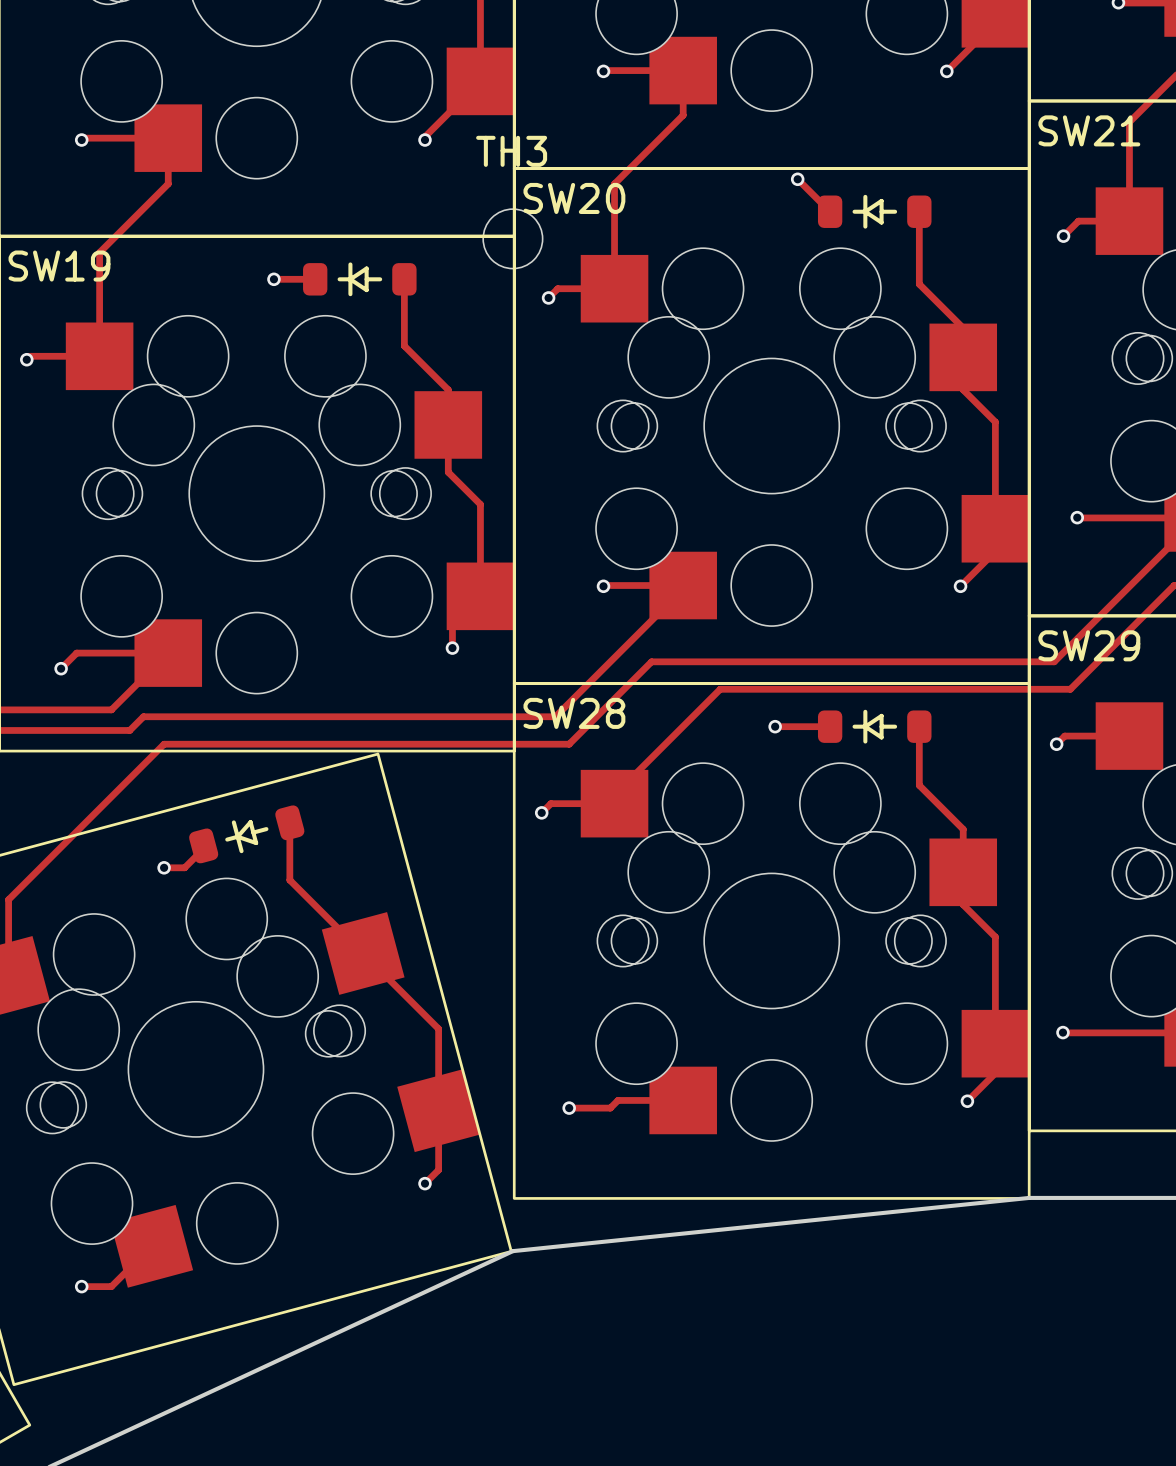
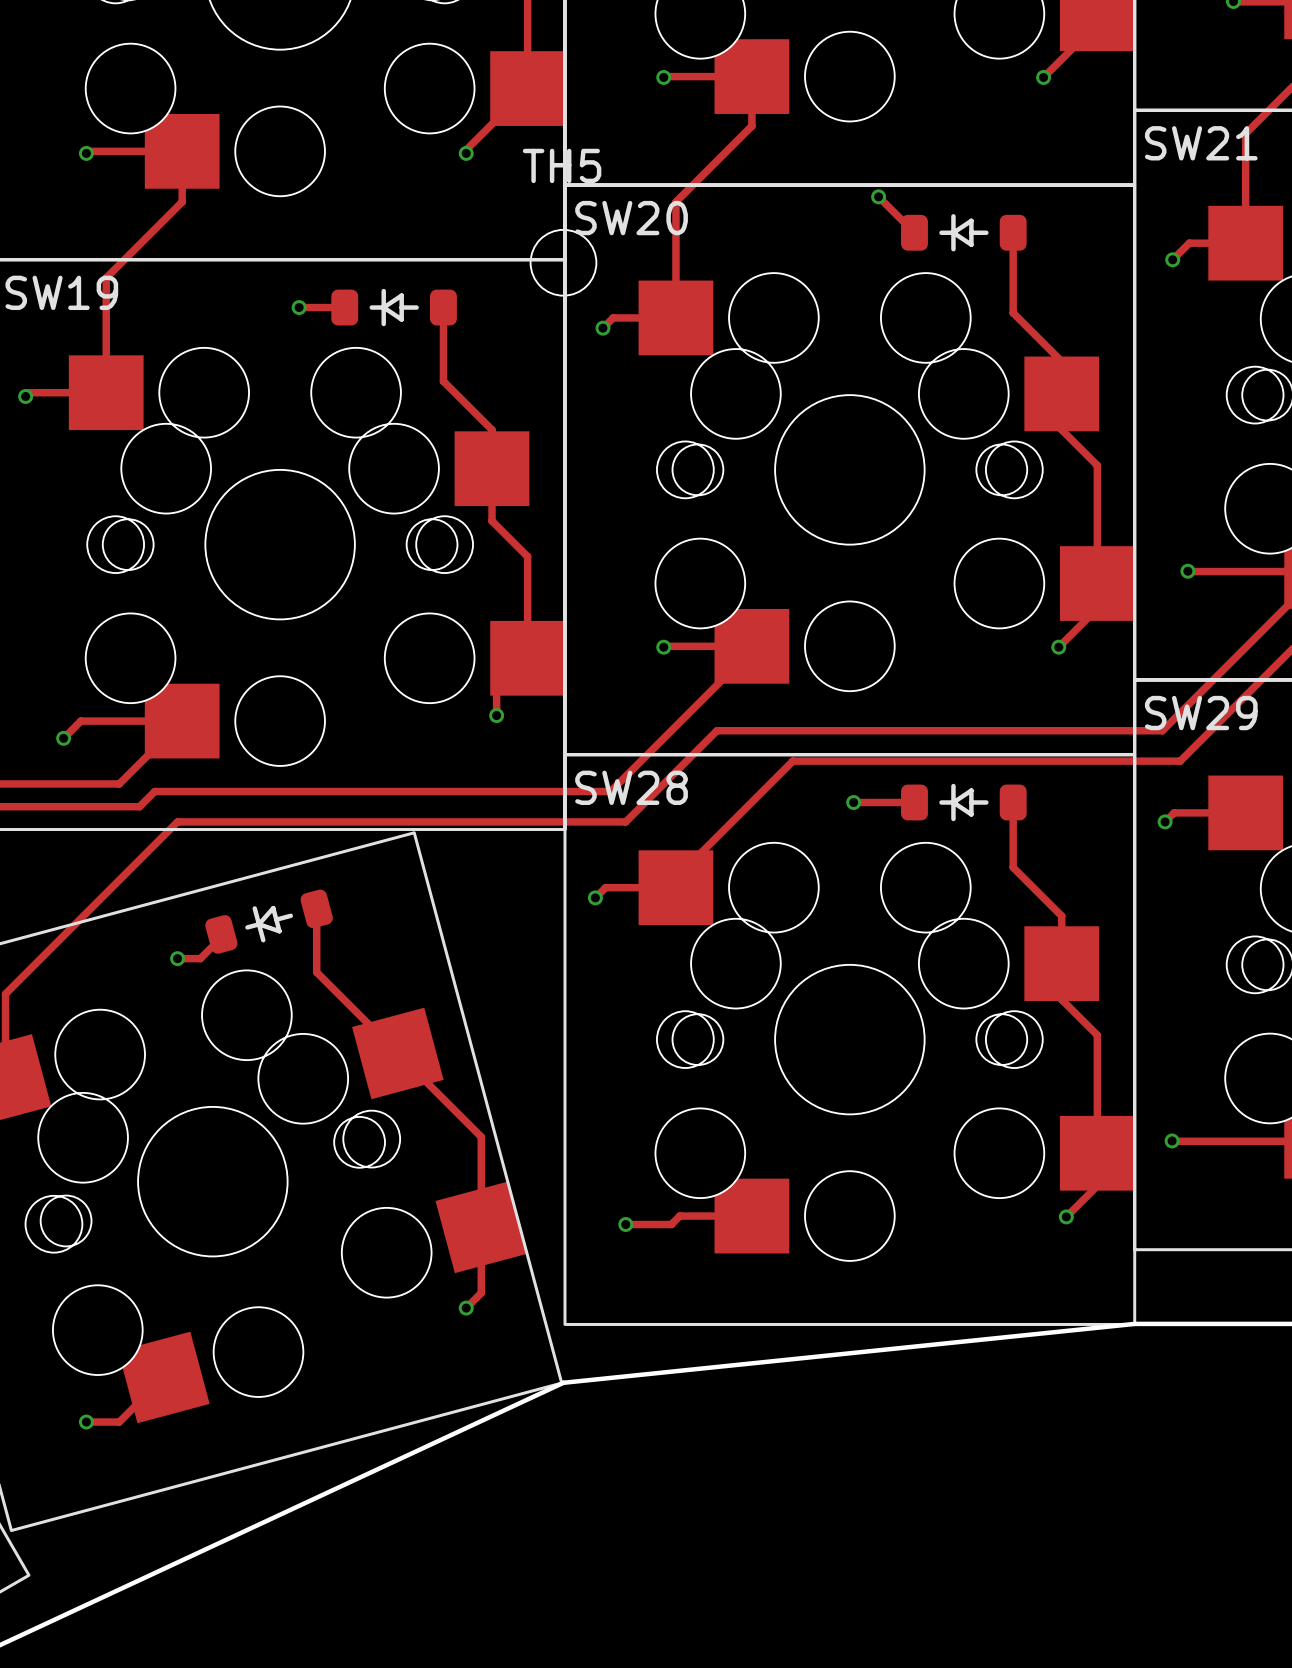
TH3 name: TH3 (511, 151) -> TH5 (562, 165)

